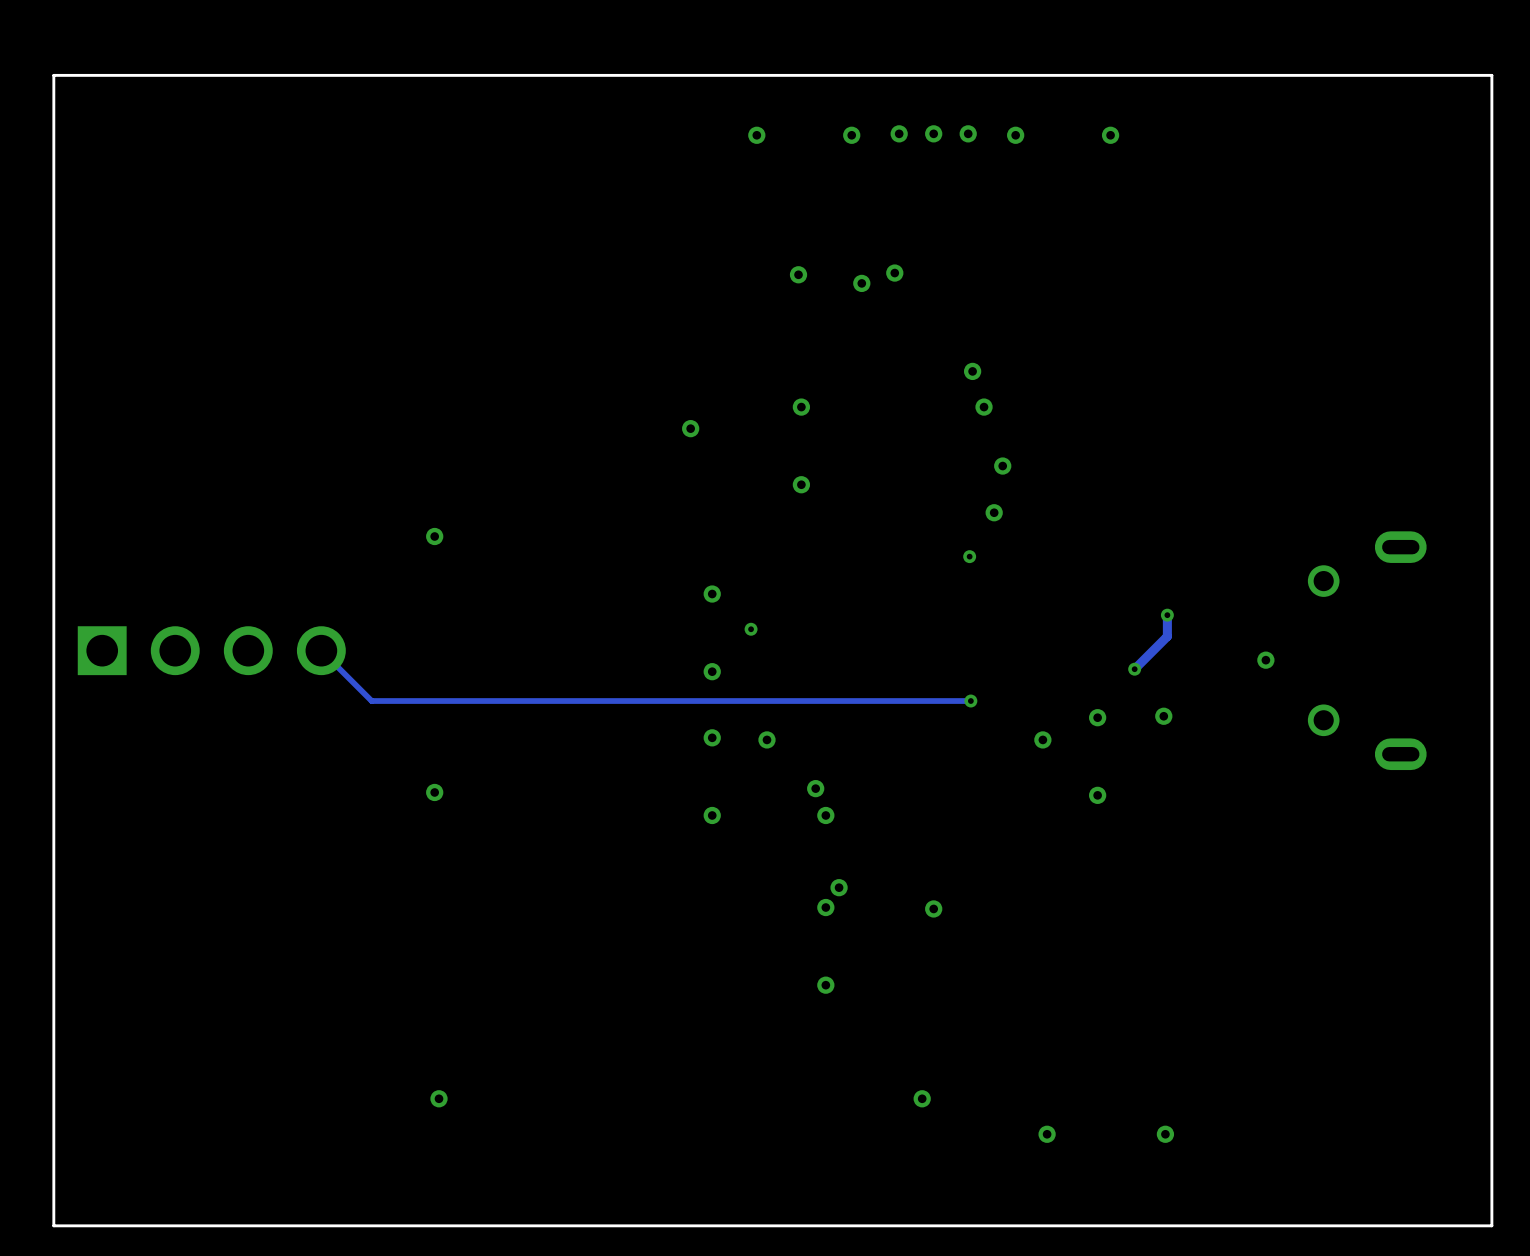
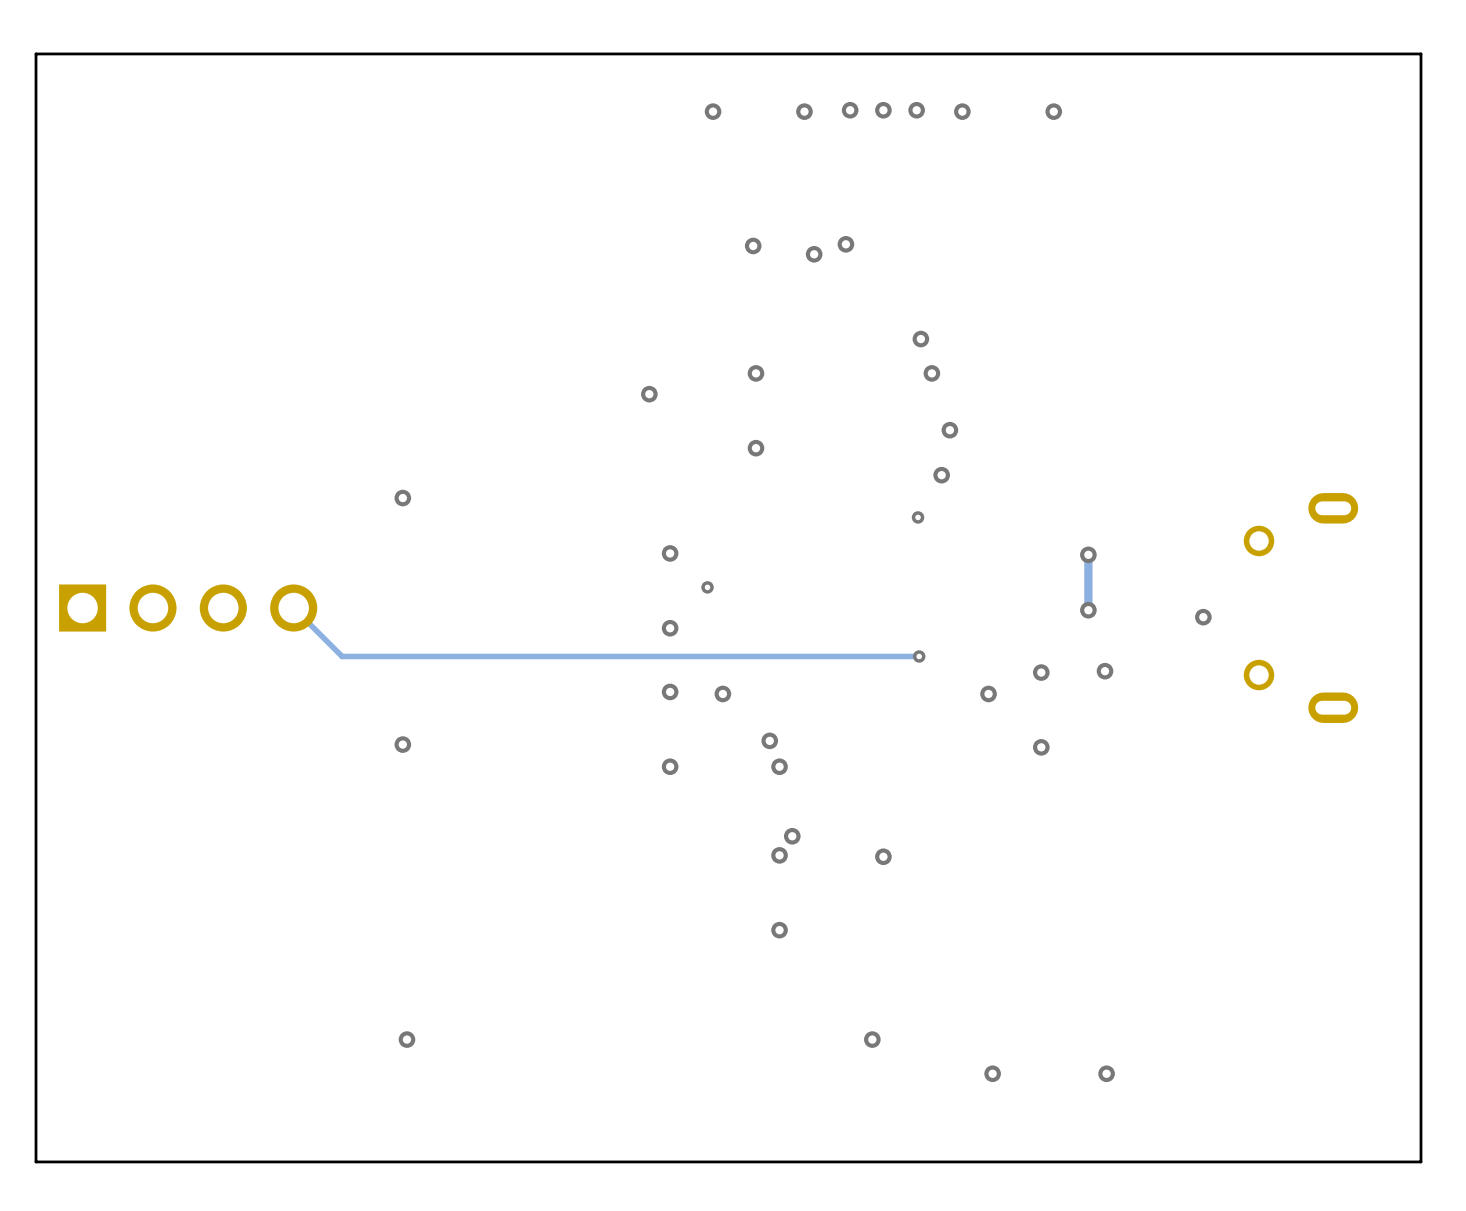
track: none -> (1088, 554) (1088, 610)
via: none -> (1088, 554)
track: (1167, 615) (1167, 636) (1134, 669) -> none
via: (1167, 615) -> none
via: none -> (1088, 610)
via: (1134, 669) -> none

